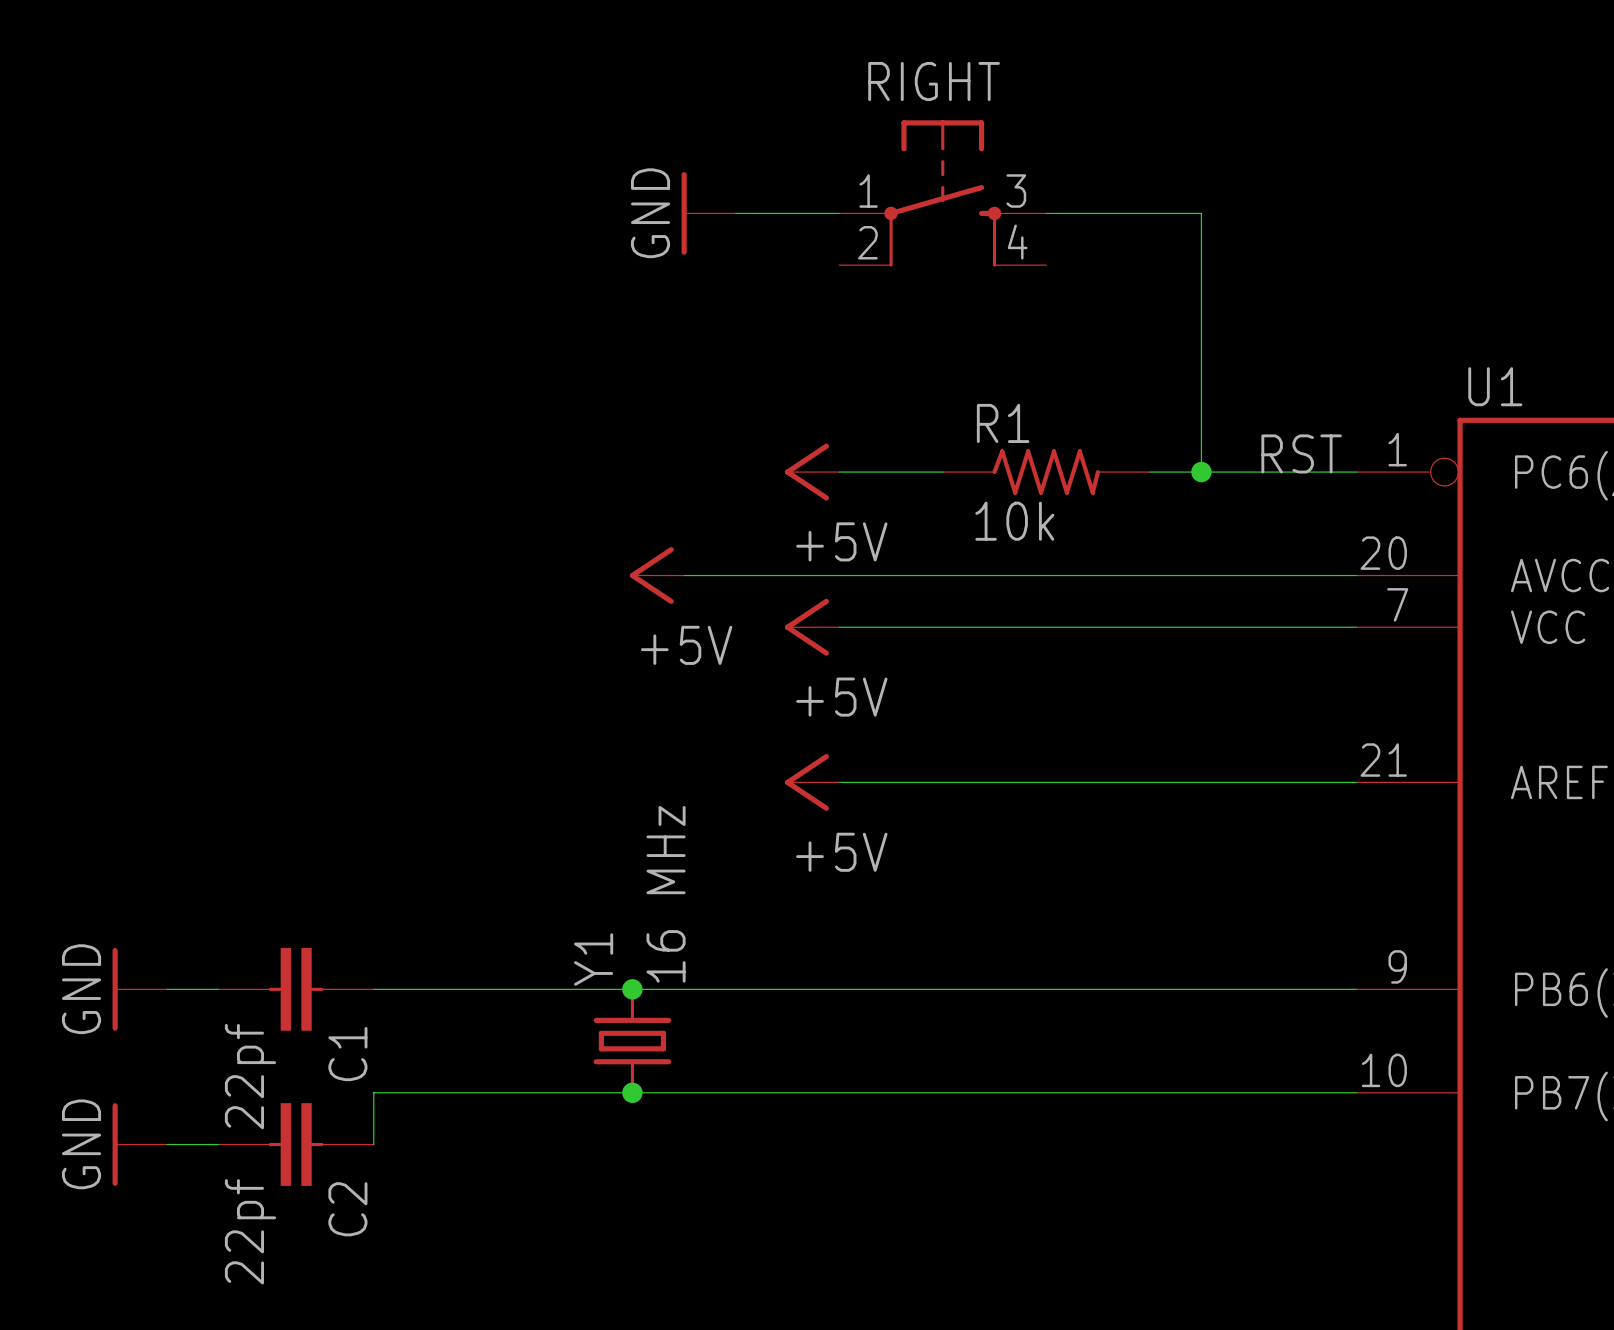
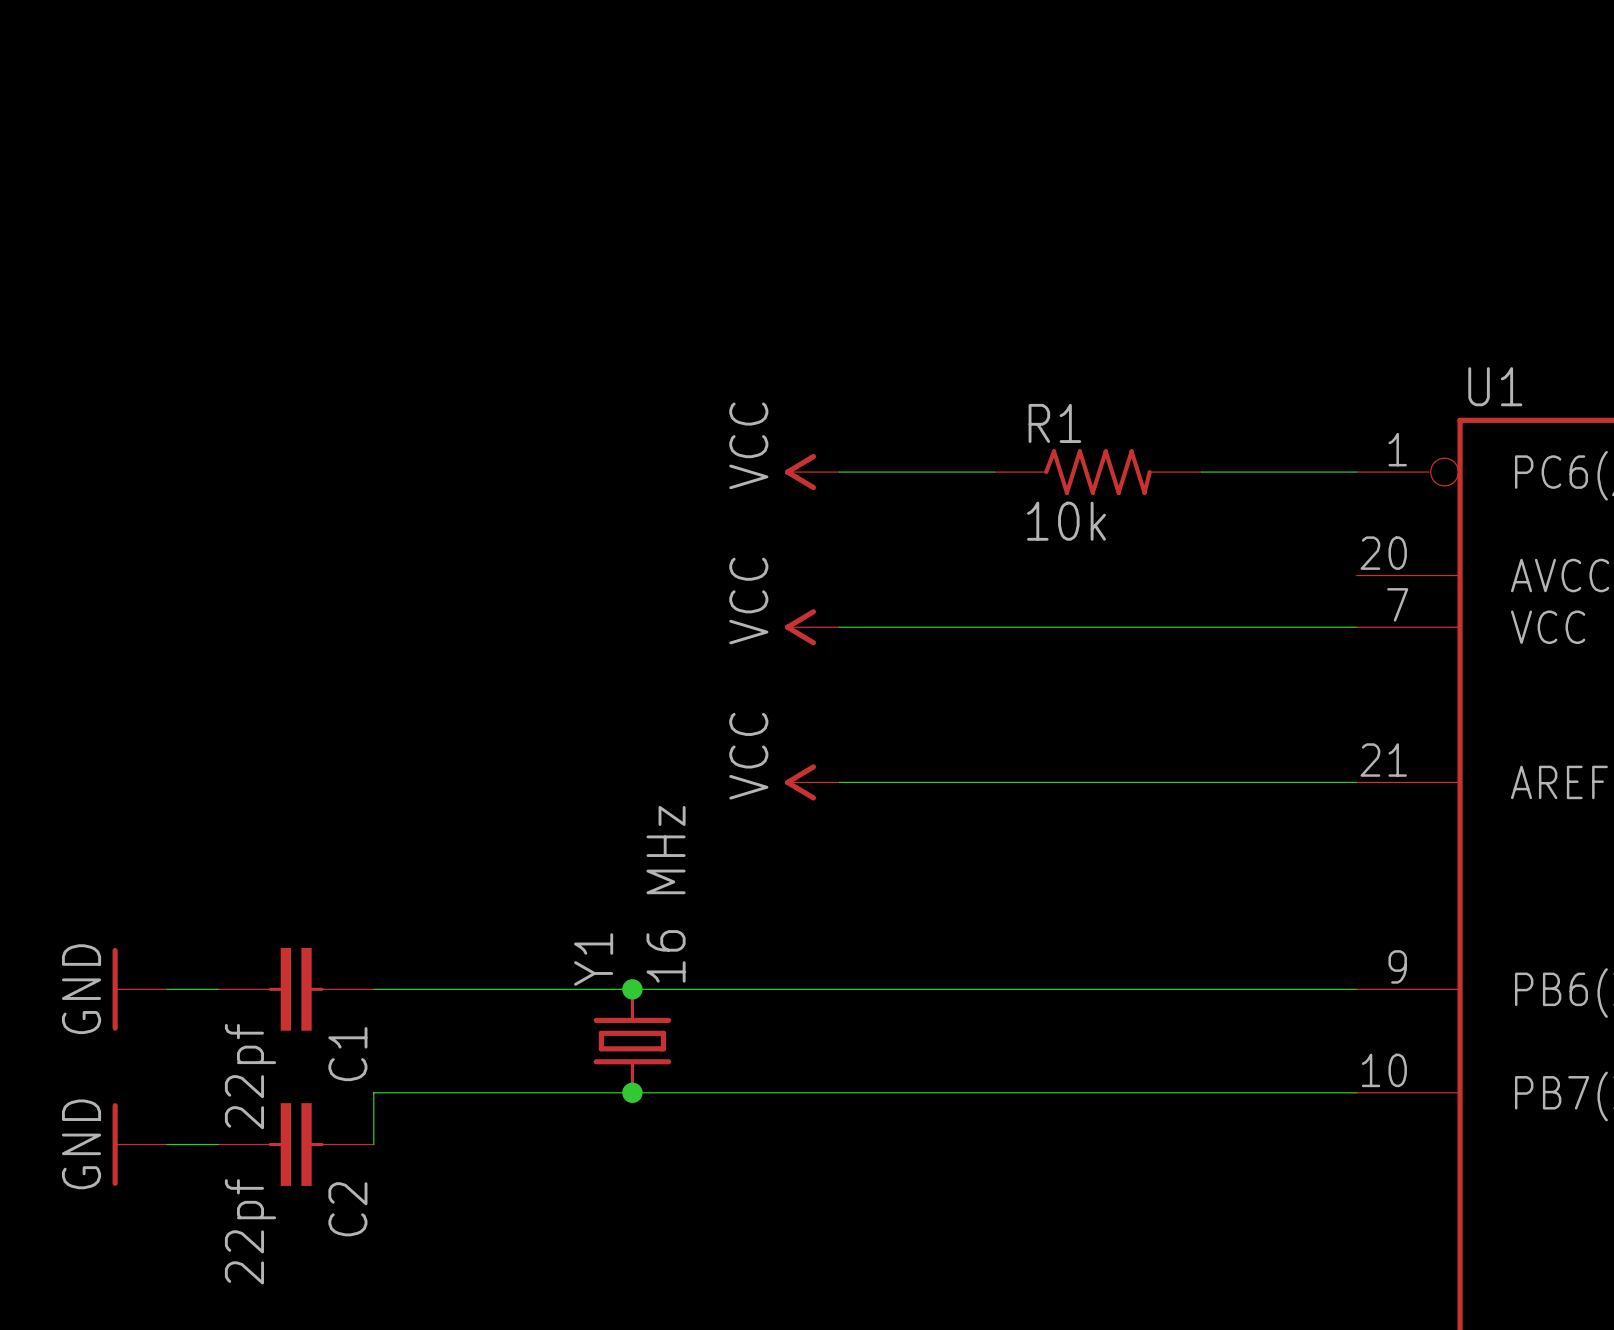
RIGHT: (942, 193) -> none
power symbol: GND (708, 213) -> none
wire: (735, 213) (839, 213) -> none
wire: (1046, 213) (1201, 213) (1201, 472) (1149, 472) -> none
label: RST (1301, 453) -> none
power symbol: +5V (812, 472) -> VCC (812, 472)
R1 position: (1046, 472) -> (1097, 472)
junction: (1201, 472) -> none
power symbol: +5V (656, 575) -> none
wire: (684, 575) (1356, 575) -> none
power symbol: +5V (812, 627) -> VCC (812, 627)
power symbol: +5V (812, 782) -> VCC (812, 782)

